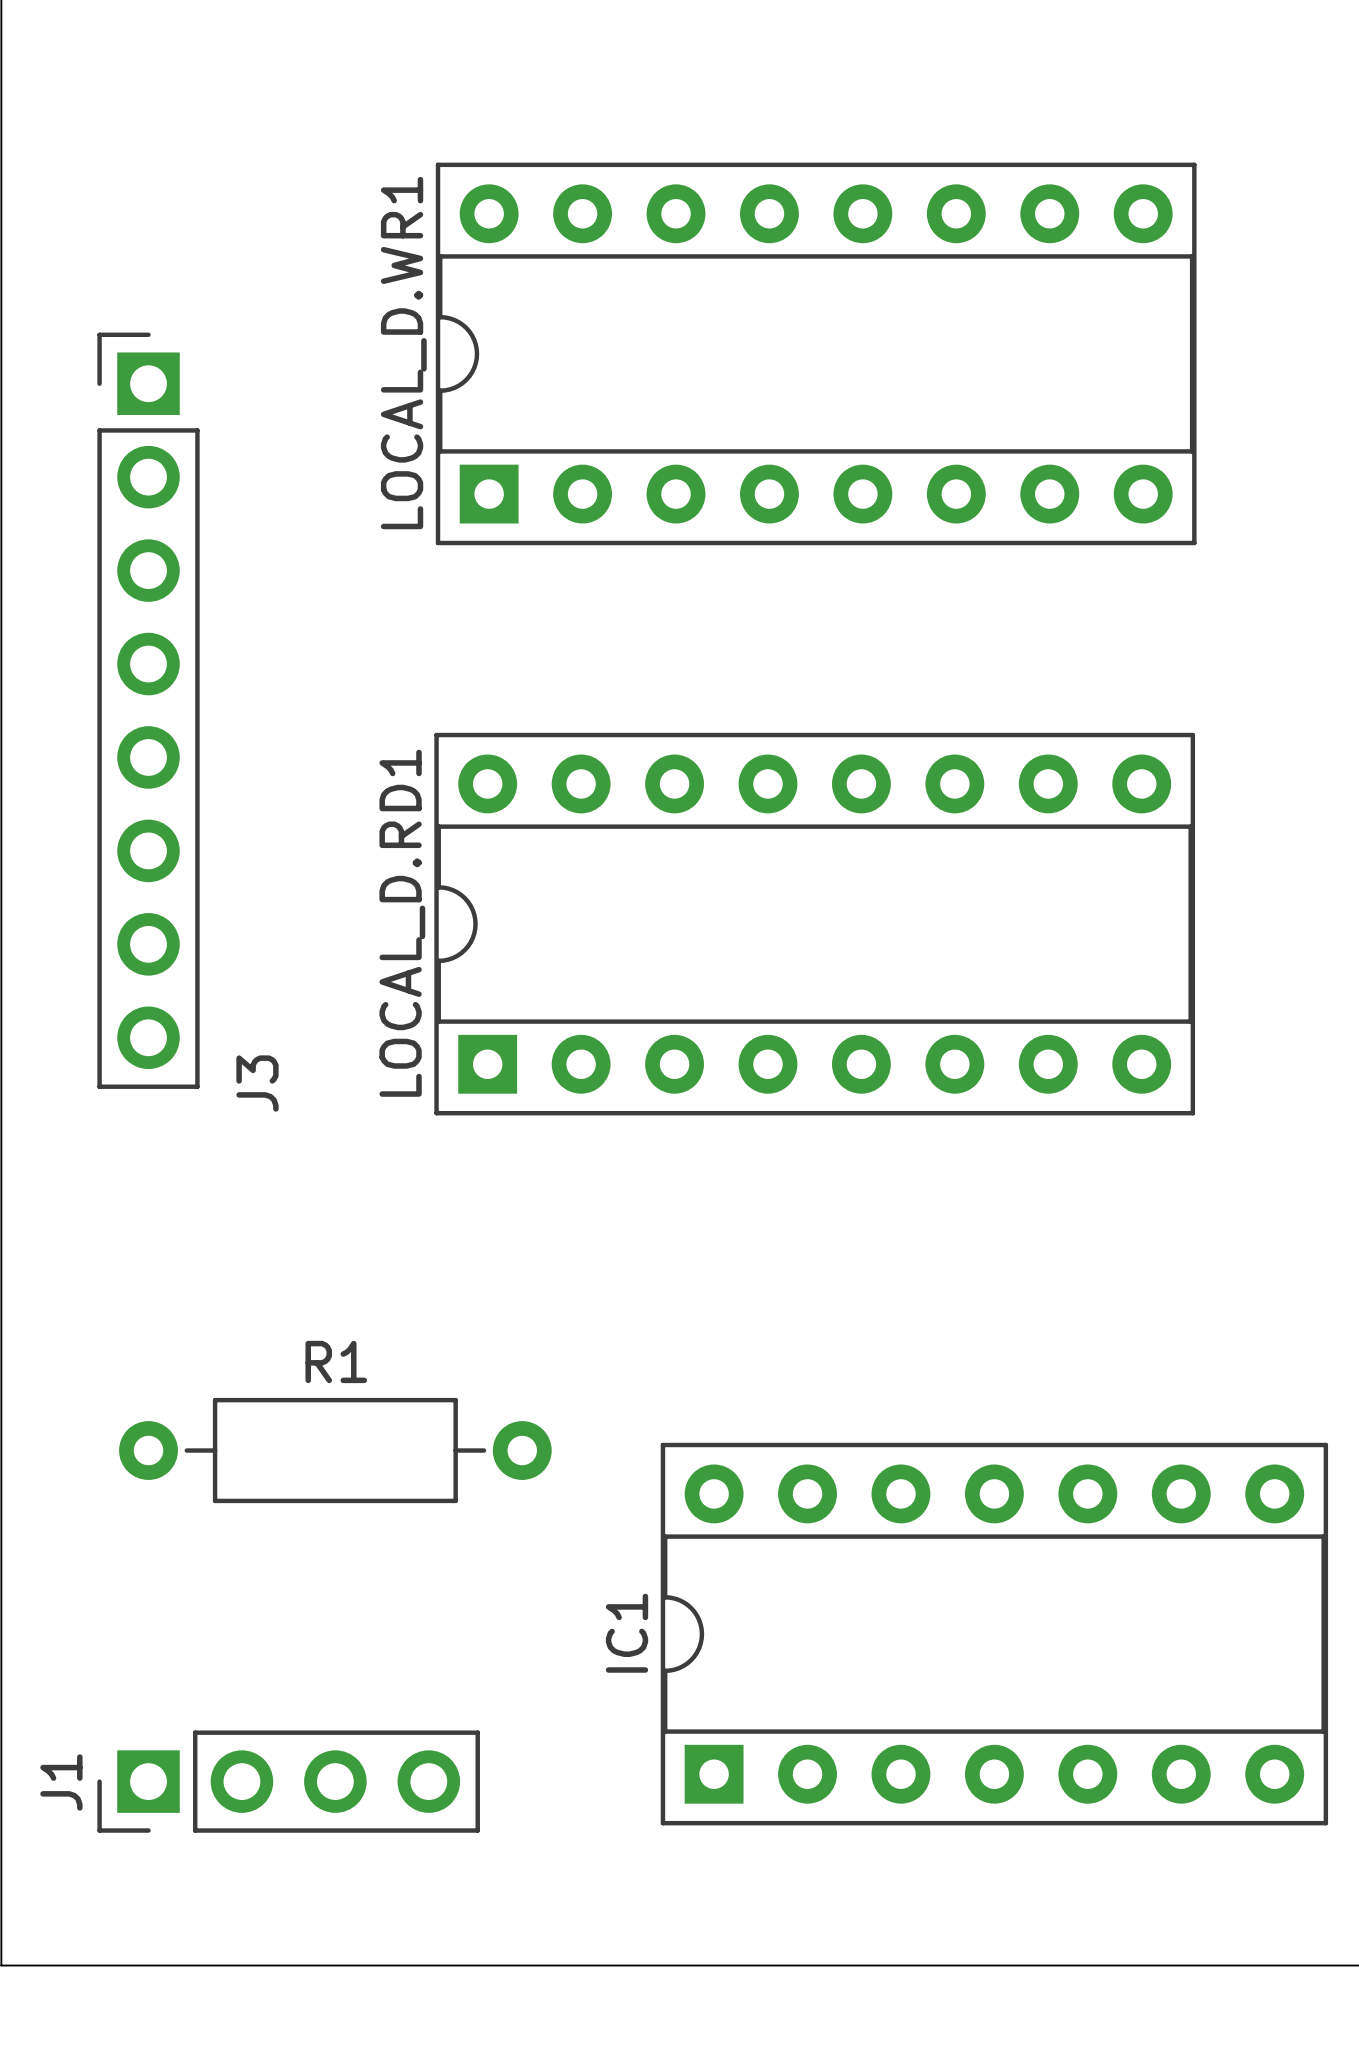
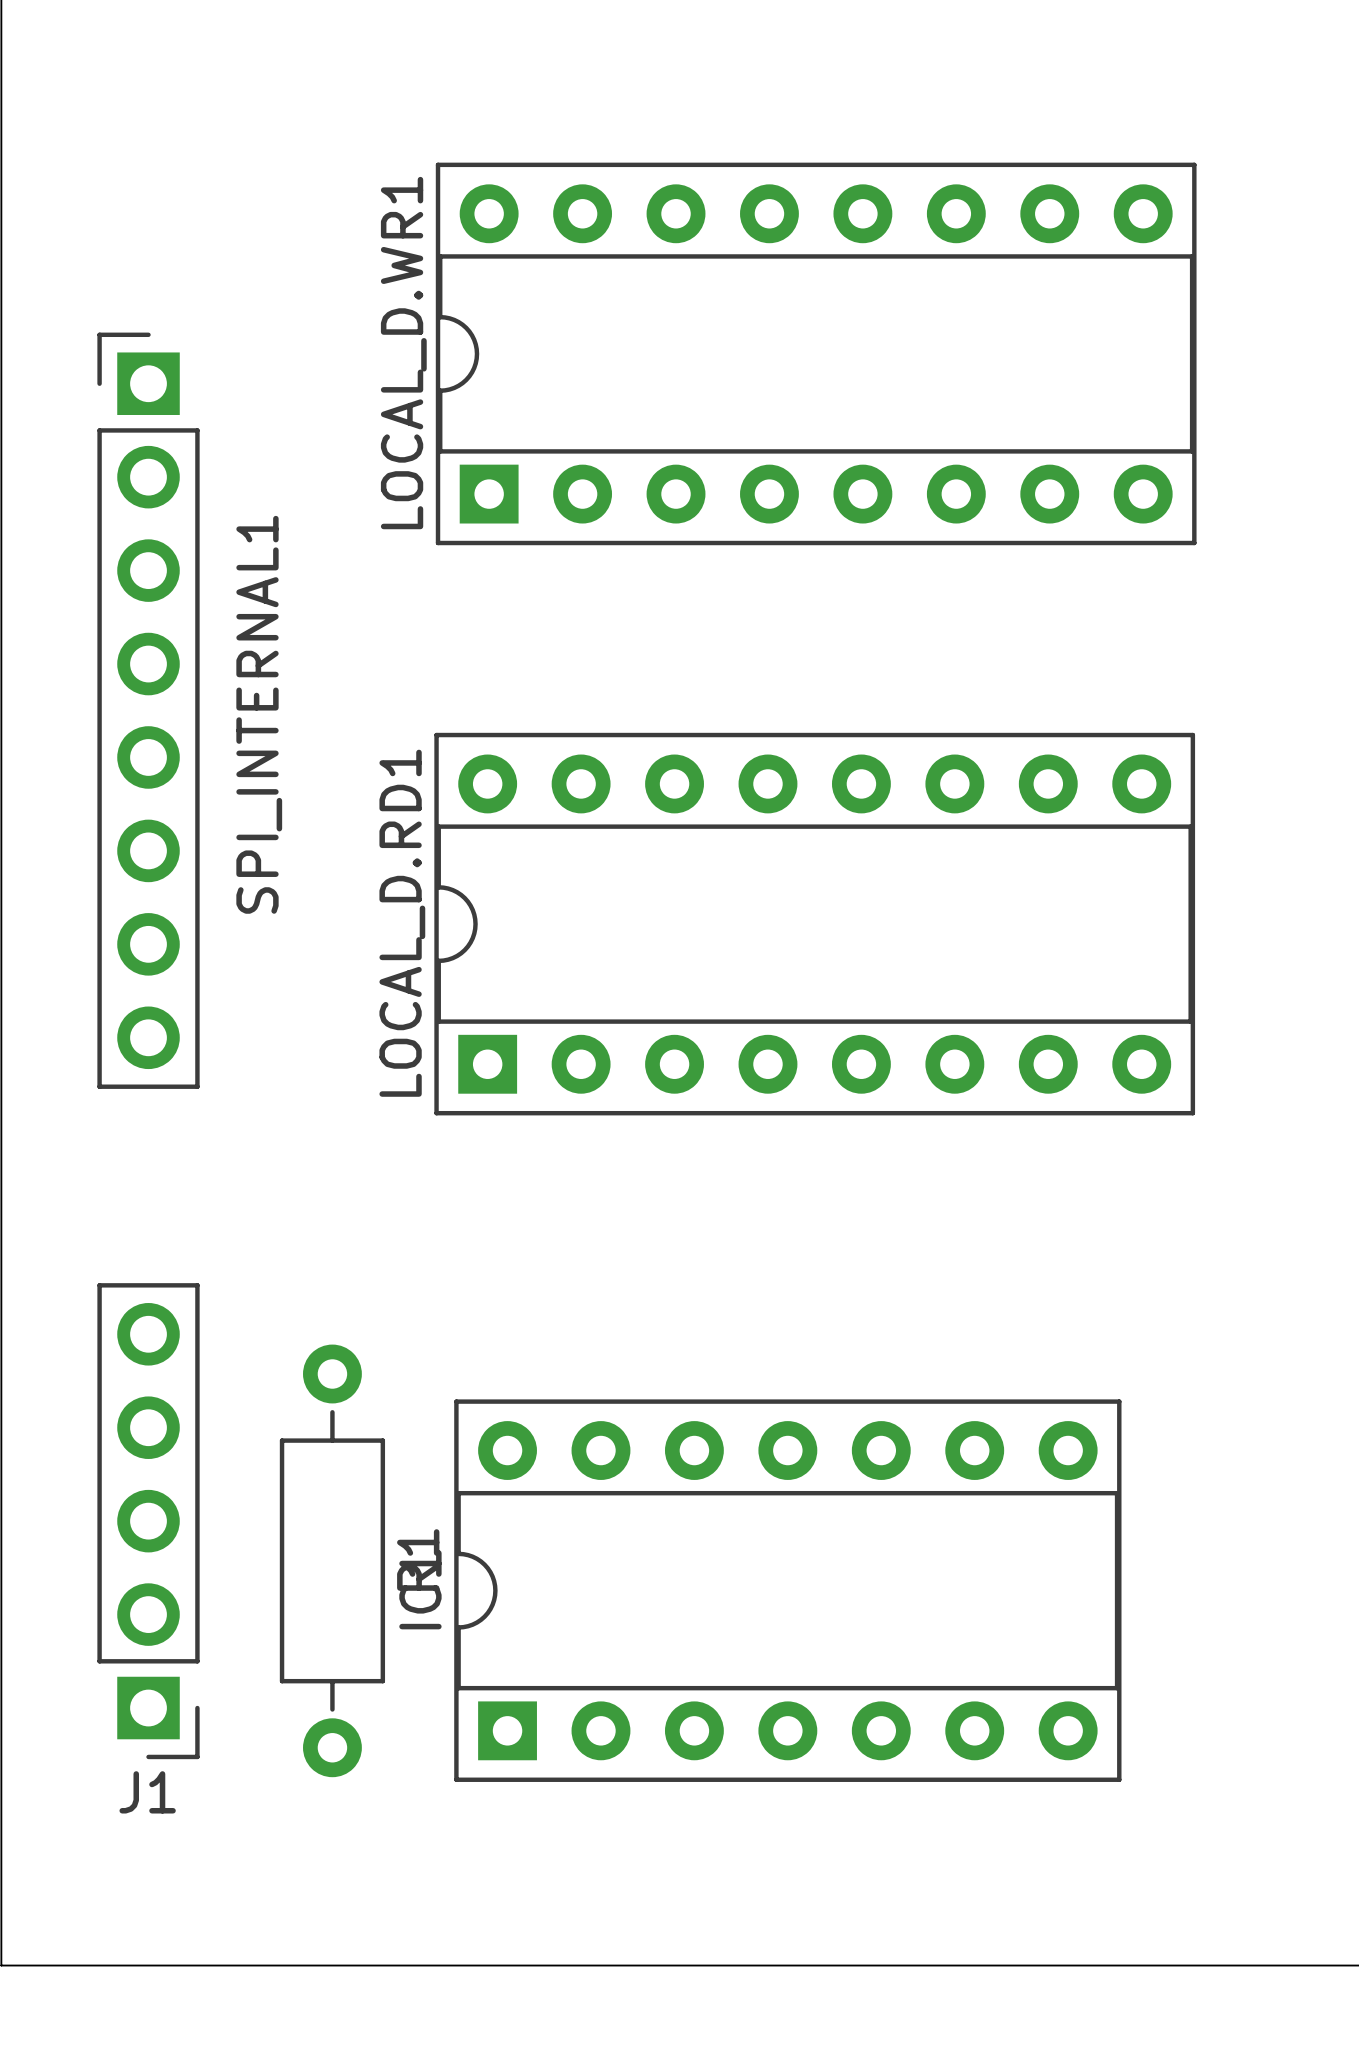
J3 name: J3 (257, 1083) -> SPI_INTERNAL1 (259, 714)
R1 rotation: 0° (335, 1450) -> 90° clockwise (332, 1560)
IC1 position: (994, 1634) -> (787, 1590)
J1 footprint: [97, 1730, 480, 1833] -> [97, 1283, 200, 1760]
J1 name position: J1 (61, 1782) -> J1 (147, 1792)

